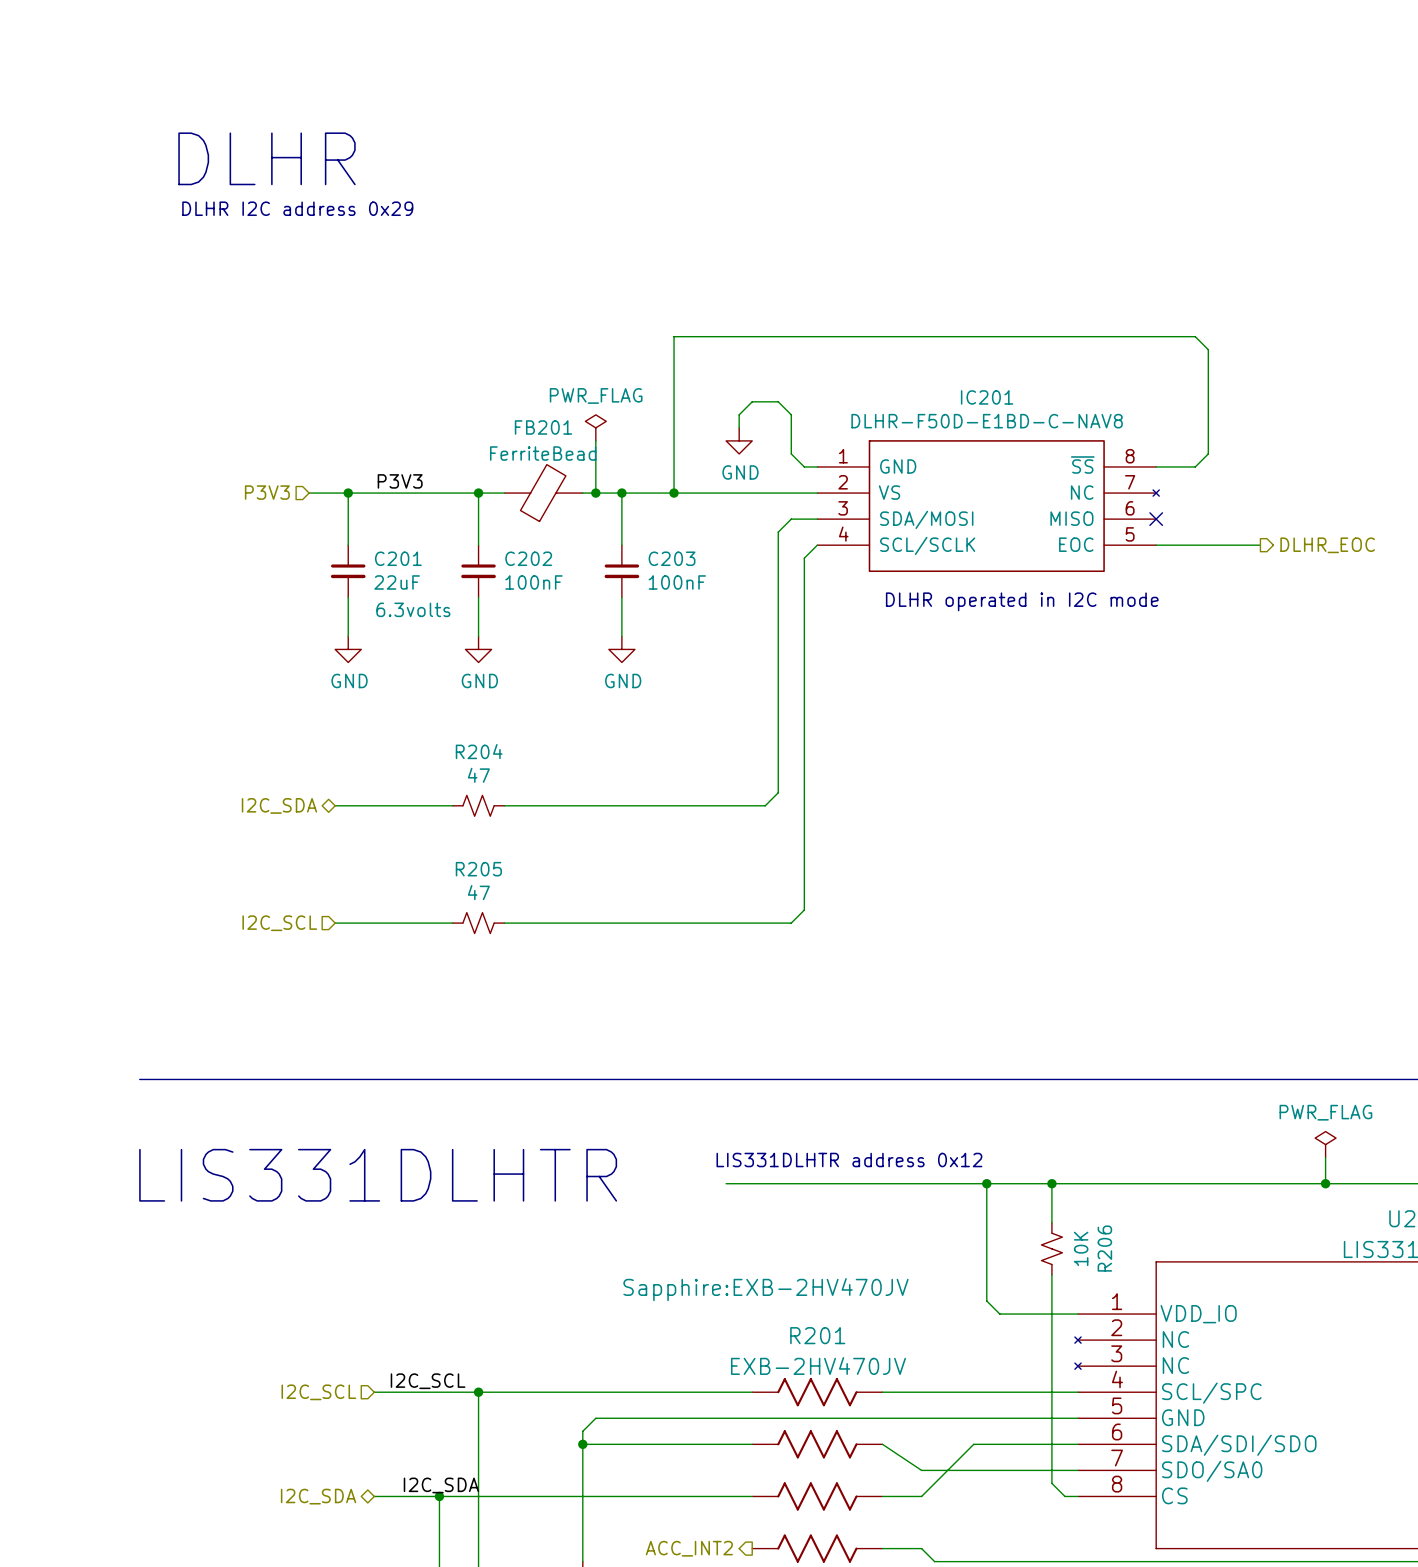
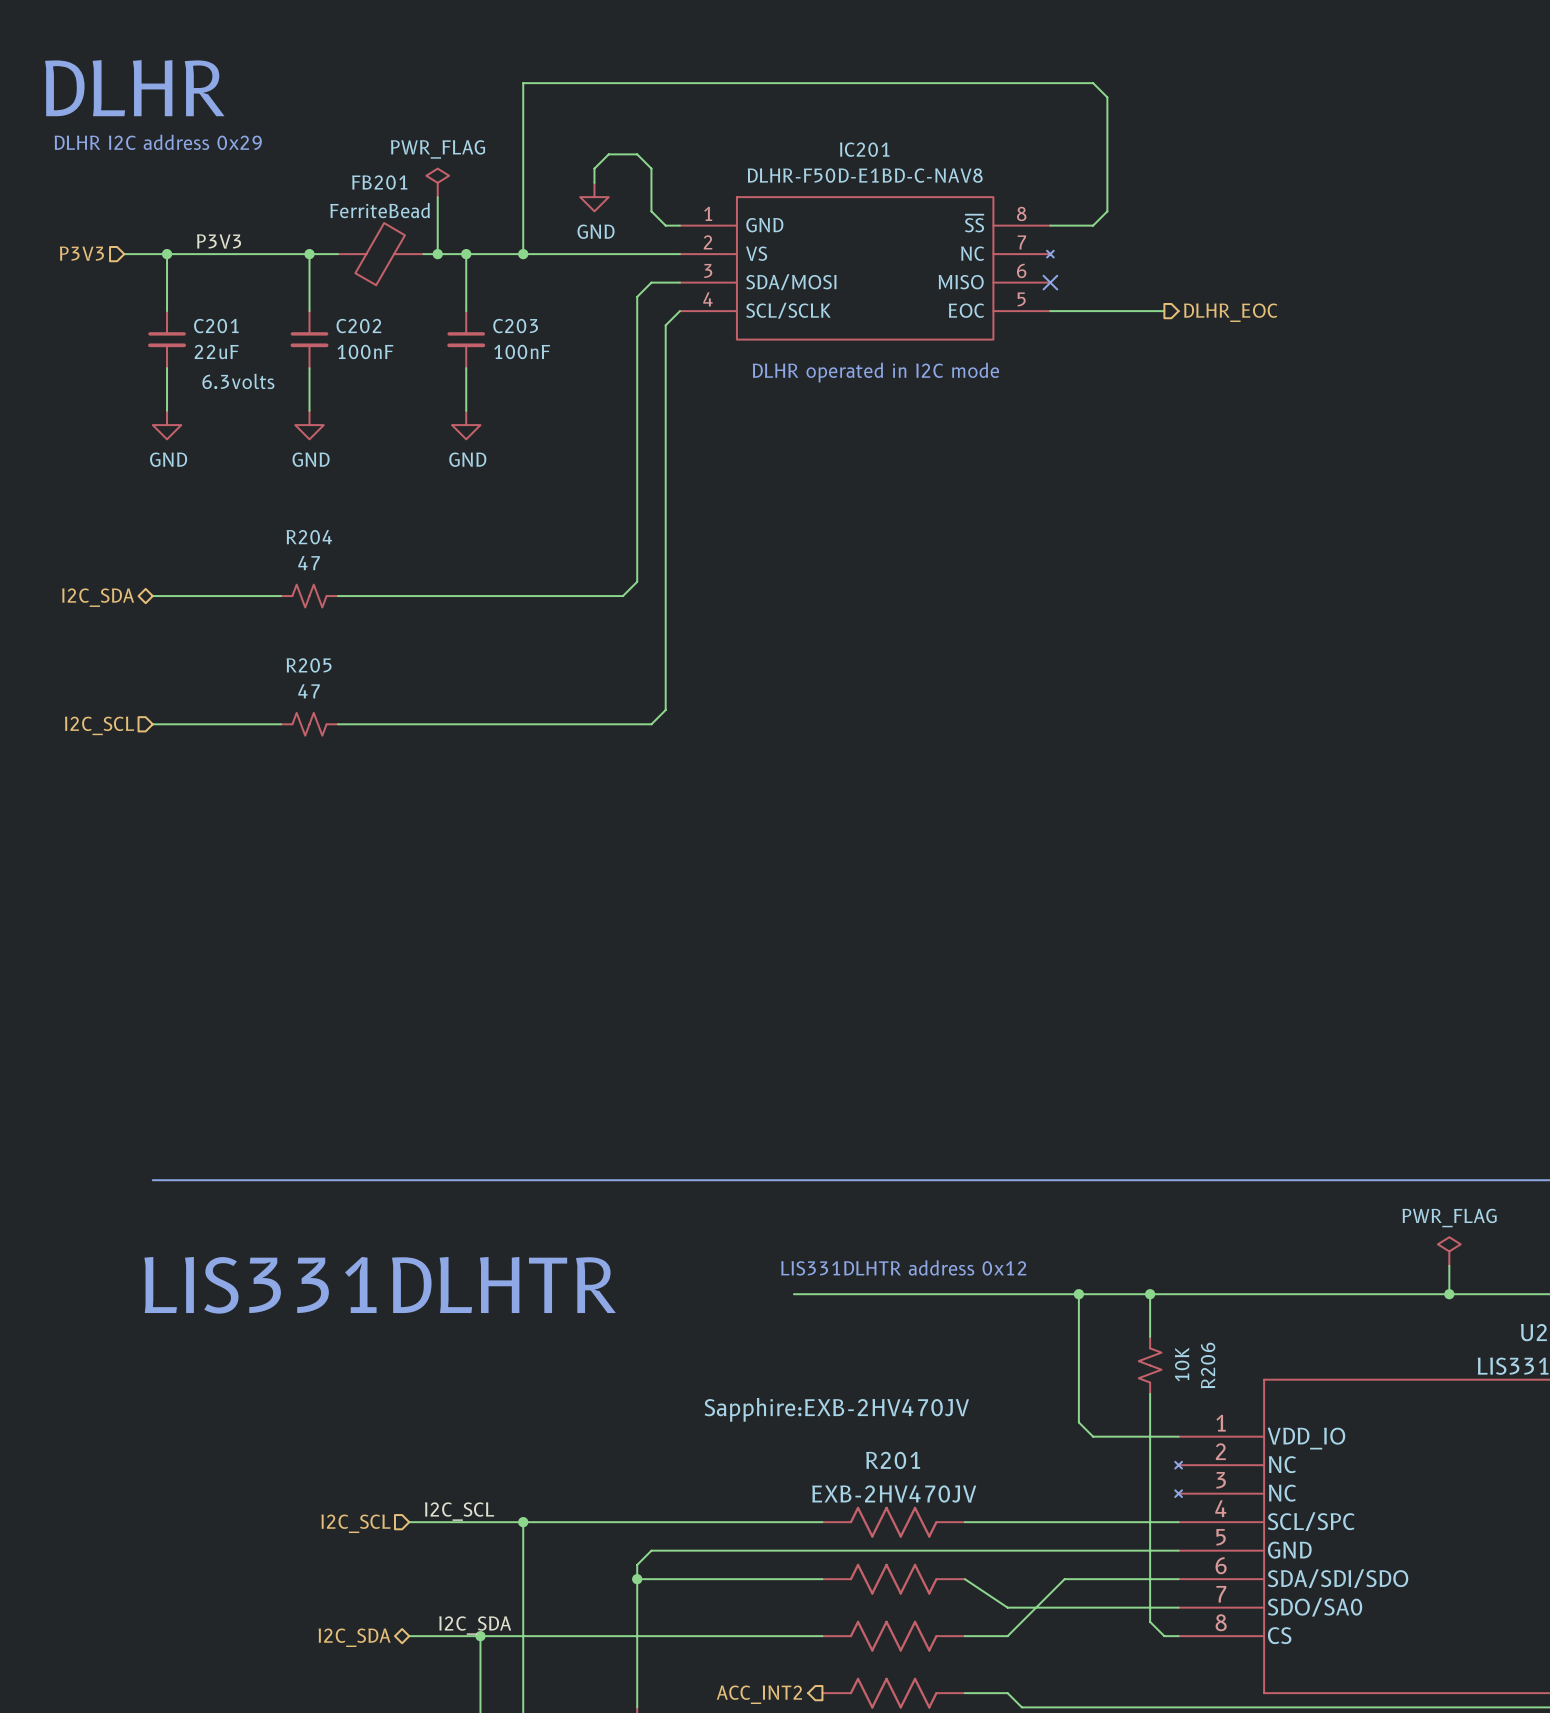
text position: DLHR (266, 158) -> DLHR (134, 88)
power symbol: none -> PWR_FLAG (437, 182)
wire: none -> (594, 182) (594, 168) (608, 154) (637, 154) (651, 168) (651, 211) (665, 225) (679, 225)
wire: none -> (437, 197) (437, 254)
power symbol: none -> GND (594, 197)
wire: none -> (1050, 225) (1093, 225) (1107, 211) (1107, 97) (1093, 83) (523, 83) (523, 254)
text position: DLHR I2C address 0x29 (297, 208) -> DLHR I2C address 0x29 (158, 142)
label: none -> P3V3 (219, 241)
hierarchical label: none -> P3V3 (81, 253)
wire: none -> (124, 254) (338, 254)
wire: none -> (167, 254) (167, 311)
junction: none -> (167, 254)
wire: none -> (309, 254) (309, 311)
junction: none -> (309, 254)
wire: none -> (423, 254) (679, 254)
junction: none -> (437, 254)
wire: none -> (466, 254) (466, 311)
junction: none -> (466, 254)
junction: none -> (523, 254)
wire: none -> (679, 282) (651, 282) (637, 296) (637, 581) (622, 596) (338, 596)
no-connect mark: none -> (1050, 282)
wire: none -> (679, 311) (665, 325) (665, 710) (651, 724) (338, 724)
wire: none -> (1050, 311) (1164, 311)
hierarchical label: none -> DLHR_EOC (1230, 312)
wire: none -> (167, 368) (167, 410)
wire: none -> (309, 368) (309, 410)
wire: none -> (466, 368) (466, 410)
text: none -> DLHR operated in I2C mode (875, 372)
power symbol: none -> GND (167, 425)
power symbol: none -> GND (309, 425)
power symbol: none -> GND (466, 425)
power symbol: PWR_FLAG (595, 427) -> none
wire: (739, 427) (739, 414) (752, 401) (778, 401) (791, 414) (791, 453) (804, 466) (817, 466) -> none
wire: (595, 440) (595, 493) -> none
power symbol: GND (739, 440) -> none
wire: (1156, 466) (1195, 466) (1208, 453) (1208, 349) (1195, 336) (674, 336) (674, 493) -> none
label: P3V3 (400, 481) -> none
hierarchical label: P3V3 (267, 492) -> none
wire: (309, 493) (504, 493) -> none
wire: (348, 493) (348, 545) -> none
junction: (348, 493) -> none
wire: (478, 493) (478, 545) -> none
junction: (478, 493) -> none
FB201 position: (543, 493) -> (380, 254)
wire: (582, 493) (817, 493) -> none
junction: (595, 493) -> none
wire: (621, 493) (621, 545) -> none
junction: (621, 493) -> none
junction: (674, 493) -> none
IC201 position: (988, 506) -> (866, 268)
wire: (817, 519) (791, 519) (778, 532) (778, 792) (765, 805) (504, 805) -> none
no-connect mark: (1156, 519) -> none
hierarchical label: none -> I2C_SDA (98, 597)
wire: none -> (152, 596) (281, 596)
wire: (817, 545) (804, 558) (804, 910) (791, 923) (504, 923) -> none
wire: (1156, 545) (1260, 545) -> none
hierarchical label: DLHR_EOC (1327, 545) -> none
C201 position: (348, 571) -> (167, 339)
C202 position: (478, 571) -> (309, 339)
C203 position: (621, 571) -> (466, 339)
wire: (348, 597) (348, 636) -> none
wire: (478, 597) (478, 636) -> none
wire: (621, 597) (621, 636) -> none
text: DLHR operated in I2C mode (1022, 601) -> none
power symbol: GND (348, 649) -> none
power symbol: GND (478, 649) -> none
power symbol: GND (621, 649) -> none
hierarchical label: none -> I2C_SCL (99, 725)
hierarchical label: I2C_SDA (279, 805) -> none
wire: (335, 805) (452, 805) -> (152, 724) (281, 724)
R204 position: (478, 805) -> (309, 596)
hierarchical label: I2C_SCL (279, 923) -> none
wire: (335, 923) (452, 923) -> none
R205 position: (478, 923) -> (309, 724)

